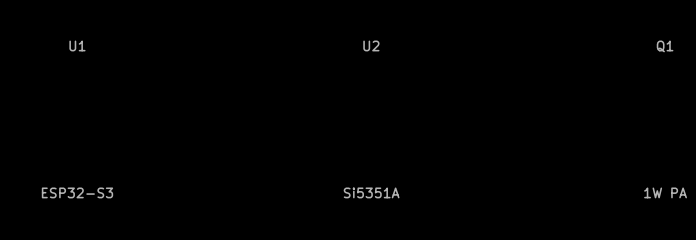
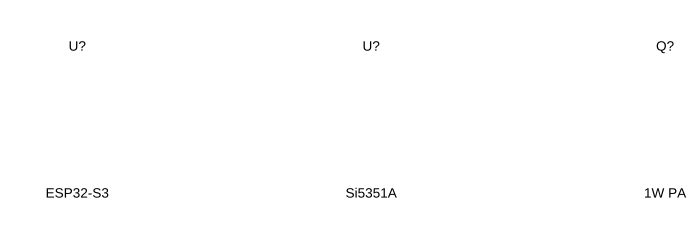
U1 name: U1 (77, 45) -> U? (77, 45)
U2 name: U2 (371, 45) -> U? (371, 45)
Q1 name: Q1 (665, 46) -> Q? (665, 47)

